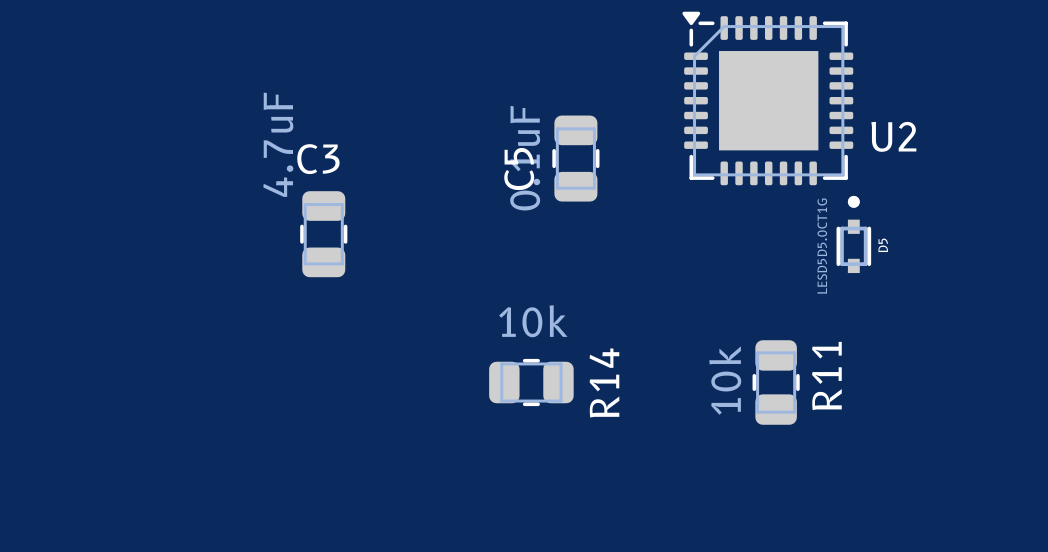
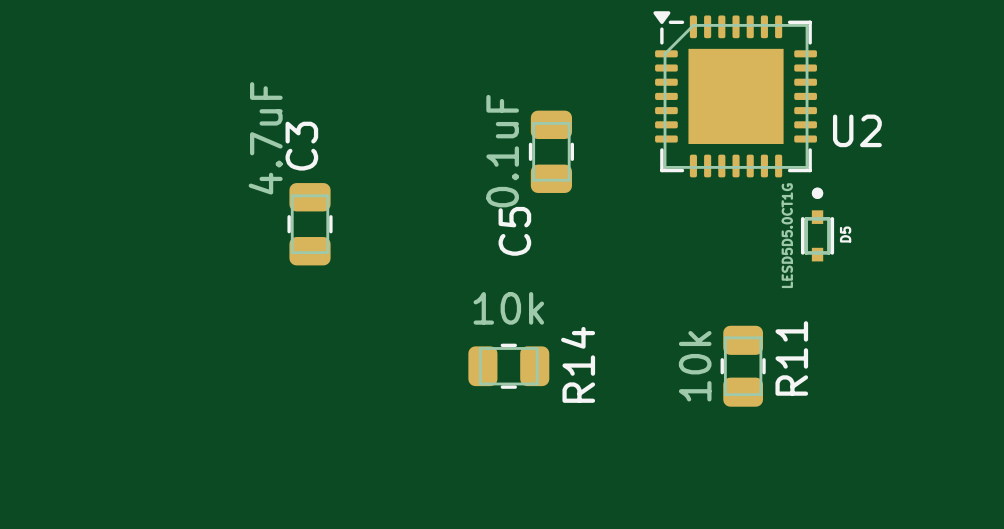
C3 name rotation: 0° (318, 159) -> 90° counterclockwise (301, 146)
C5 name position: C5 (519, 169) -> C5 (514, 231)

